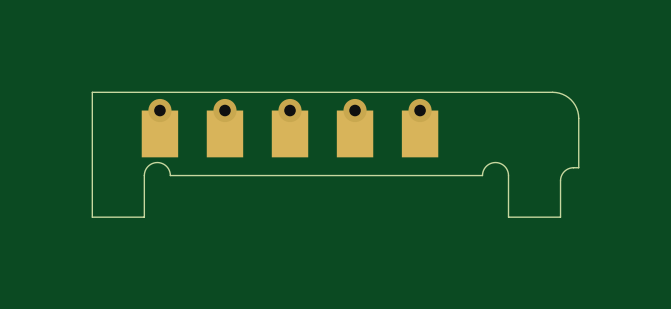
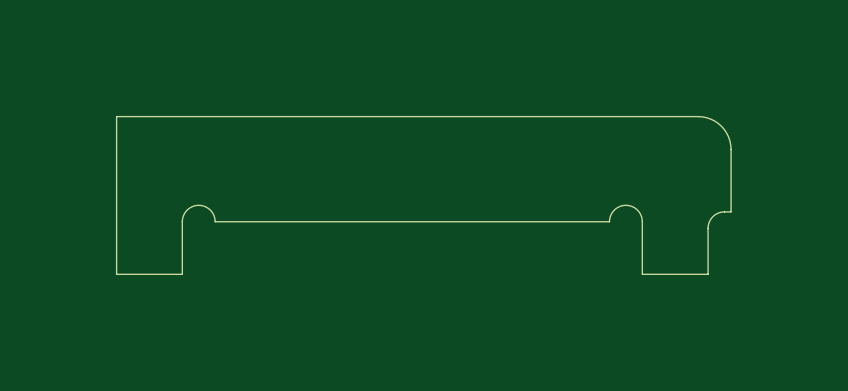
via: (159, 110) -> none
via: (224, 110) -> none
via: (290, 110) -> none
via: (355, 110) -> none
via: (420, 110) -> none
part: (159, 133) -> none
part: (224, 133) -> none
part: (290, 133) -> none
part: (355, 133) -> none
part: (420, 133) -> none

